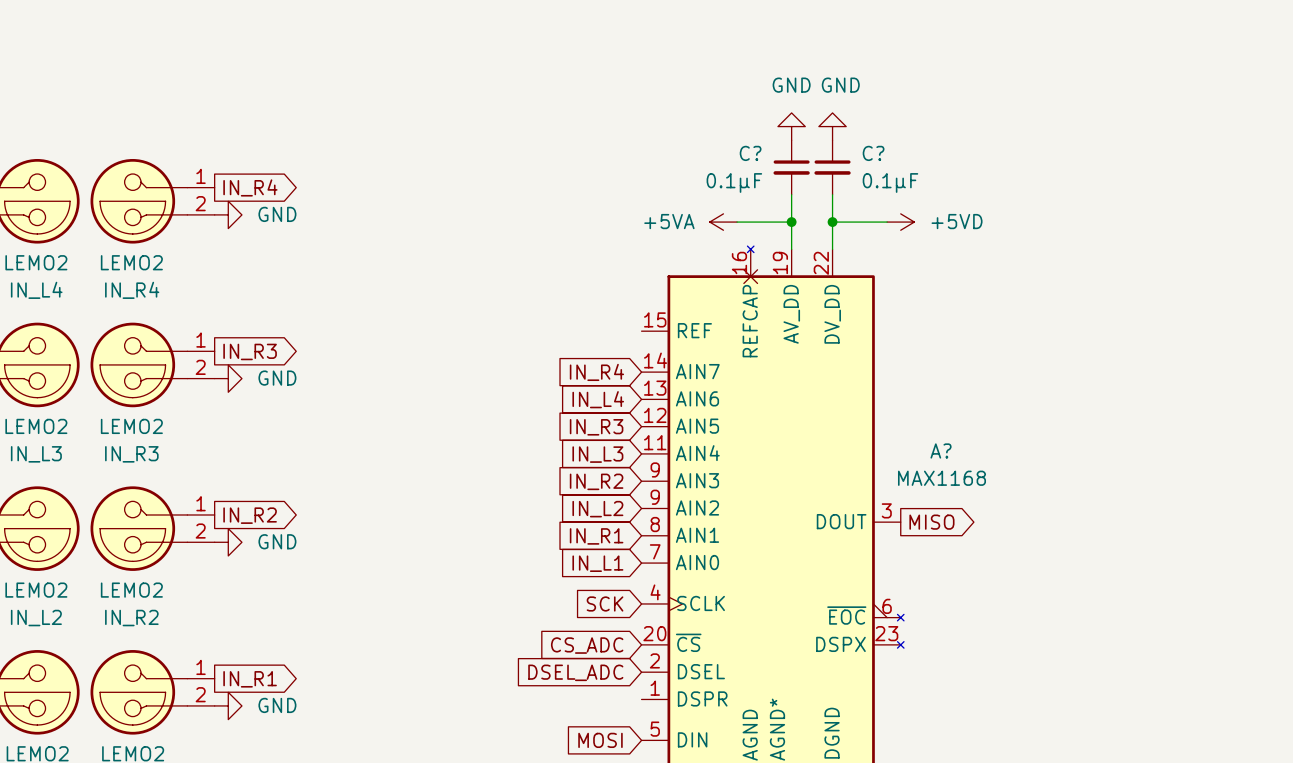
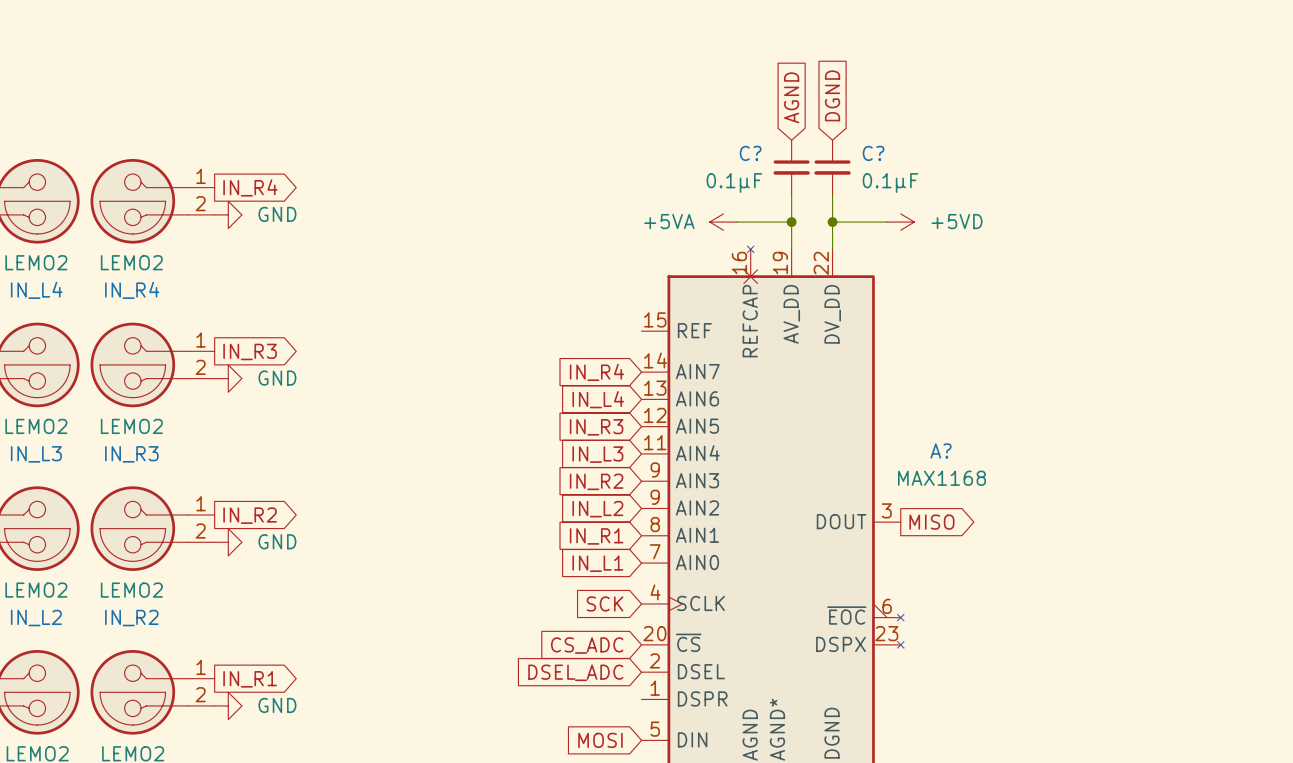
global label: none -> DGND (832, 95)
global label: none -> AGND (791, 97)
power symbol: GND (791, 126) -> none
power symbol: GND (832, 126) -> none

